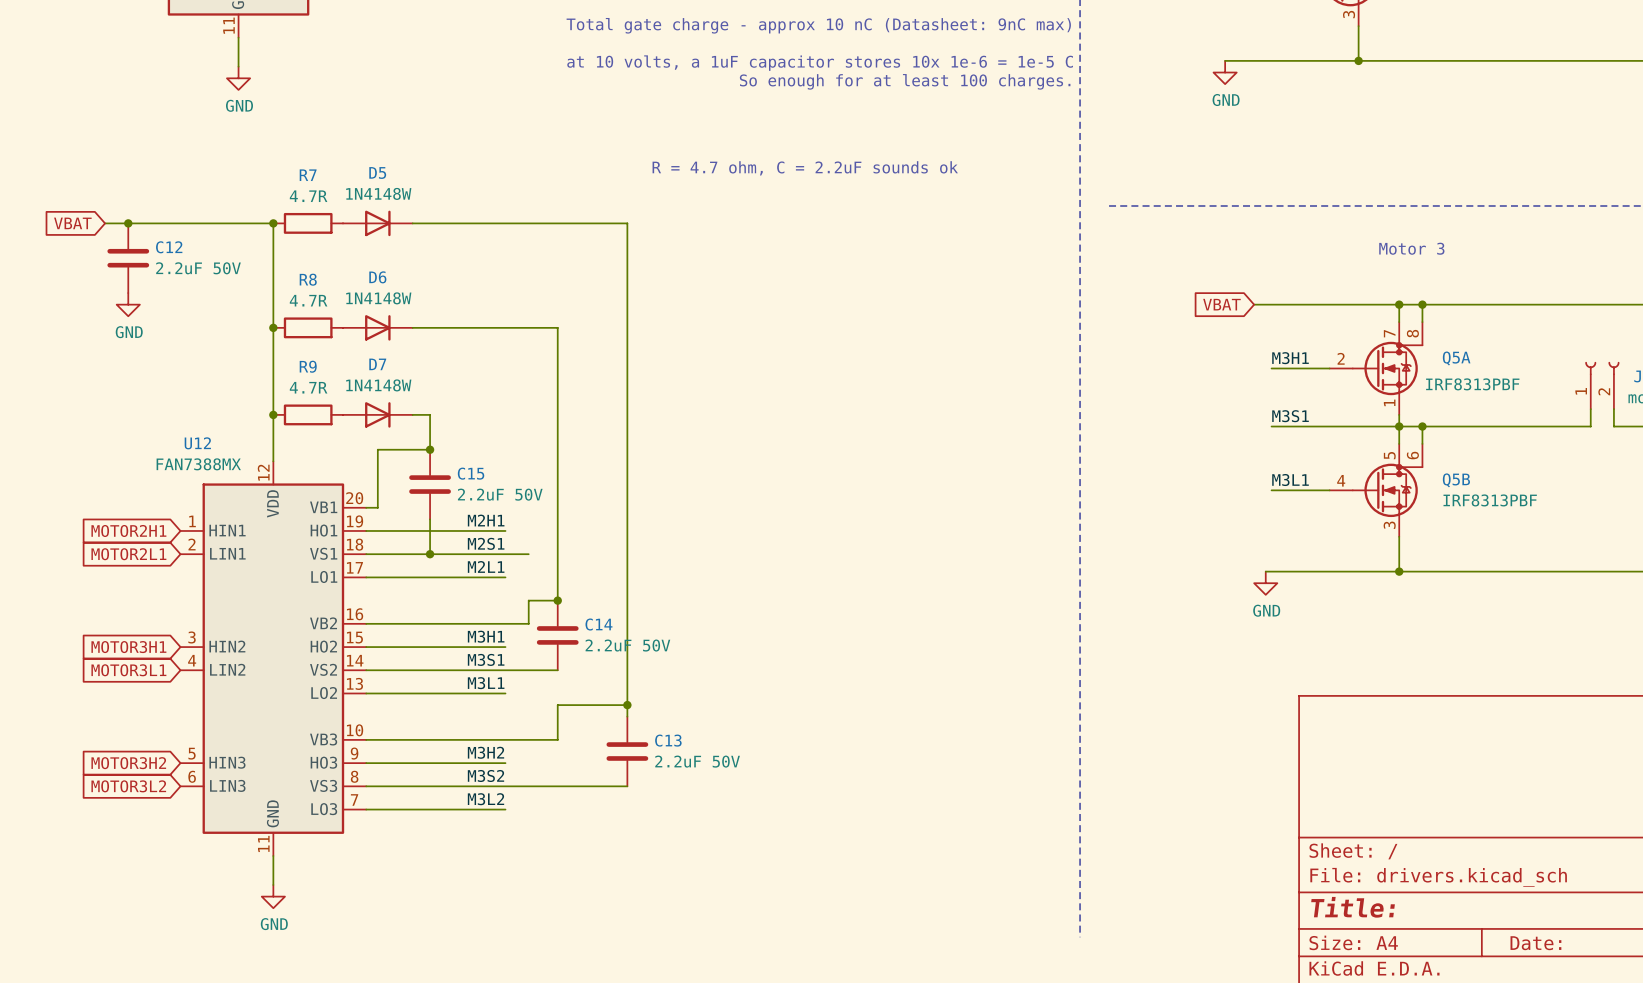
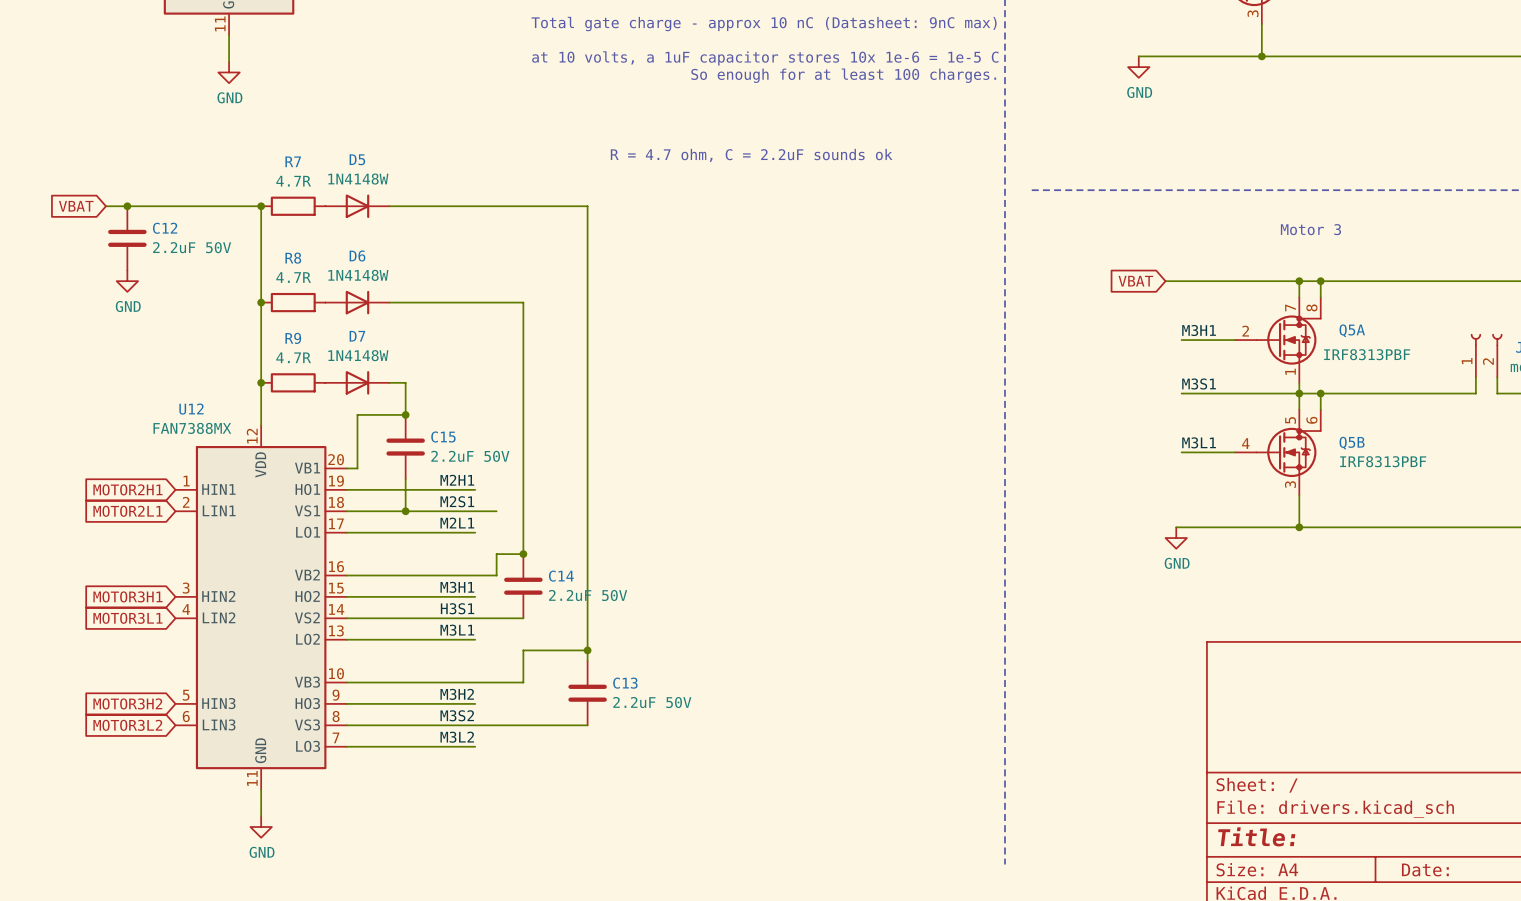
label: M3S1 (486, 659) -> H3S1 (457, 608)

